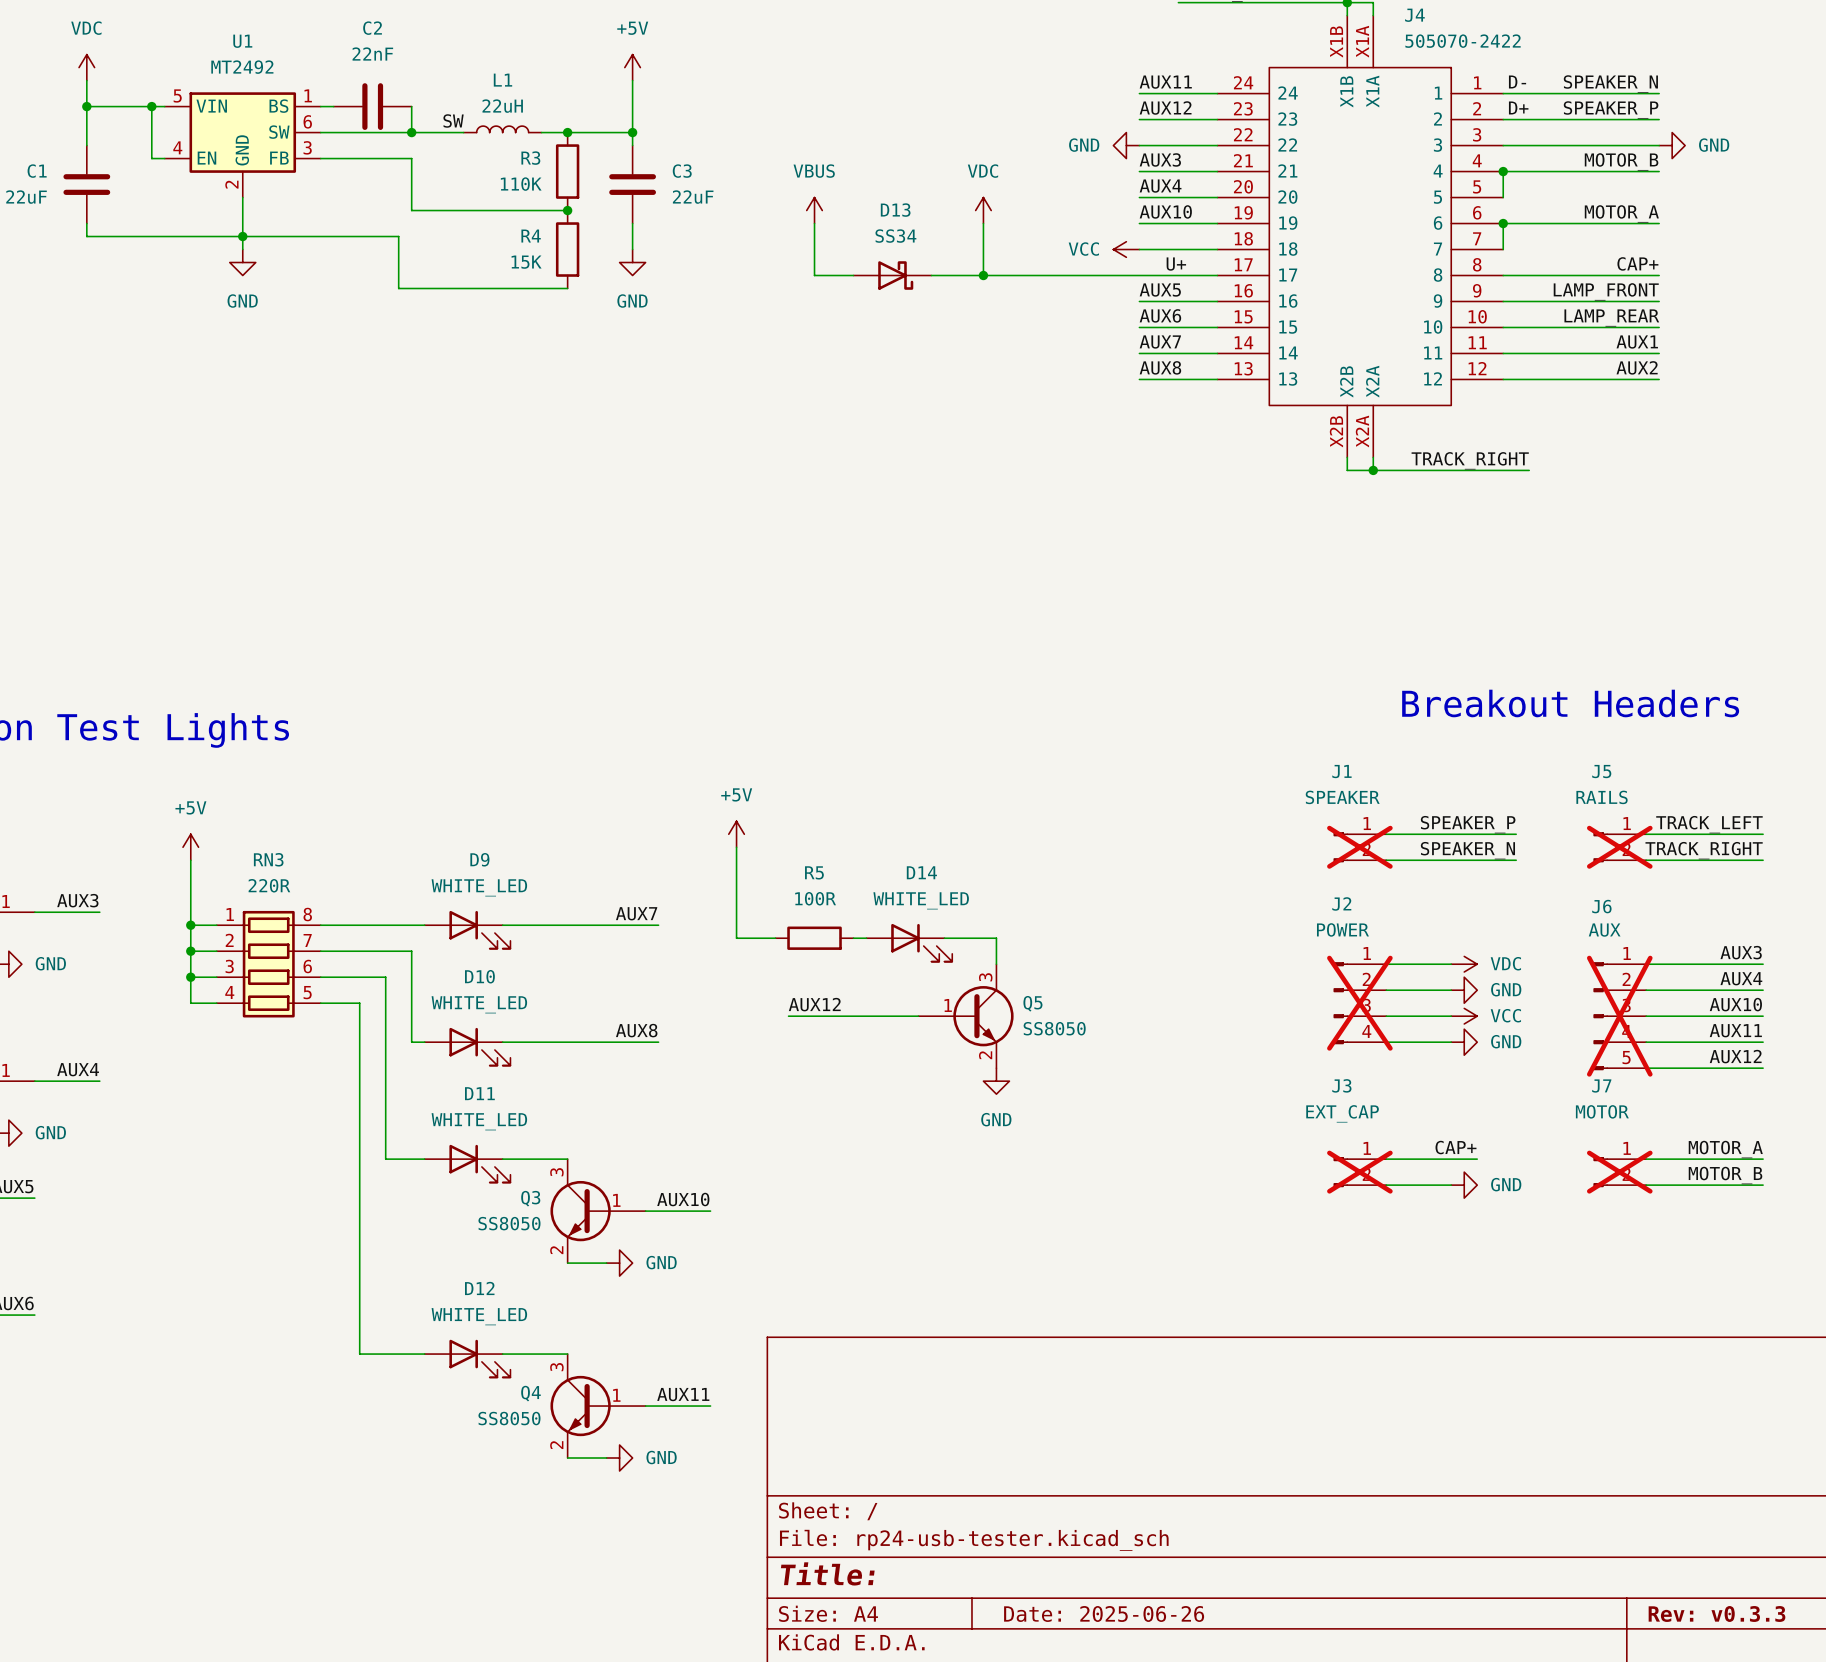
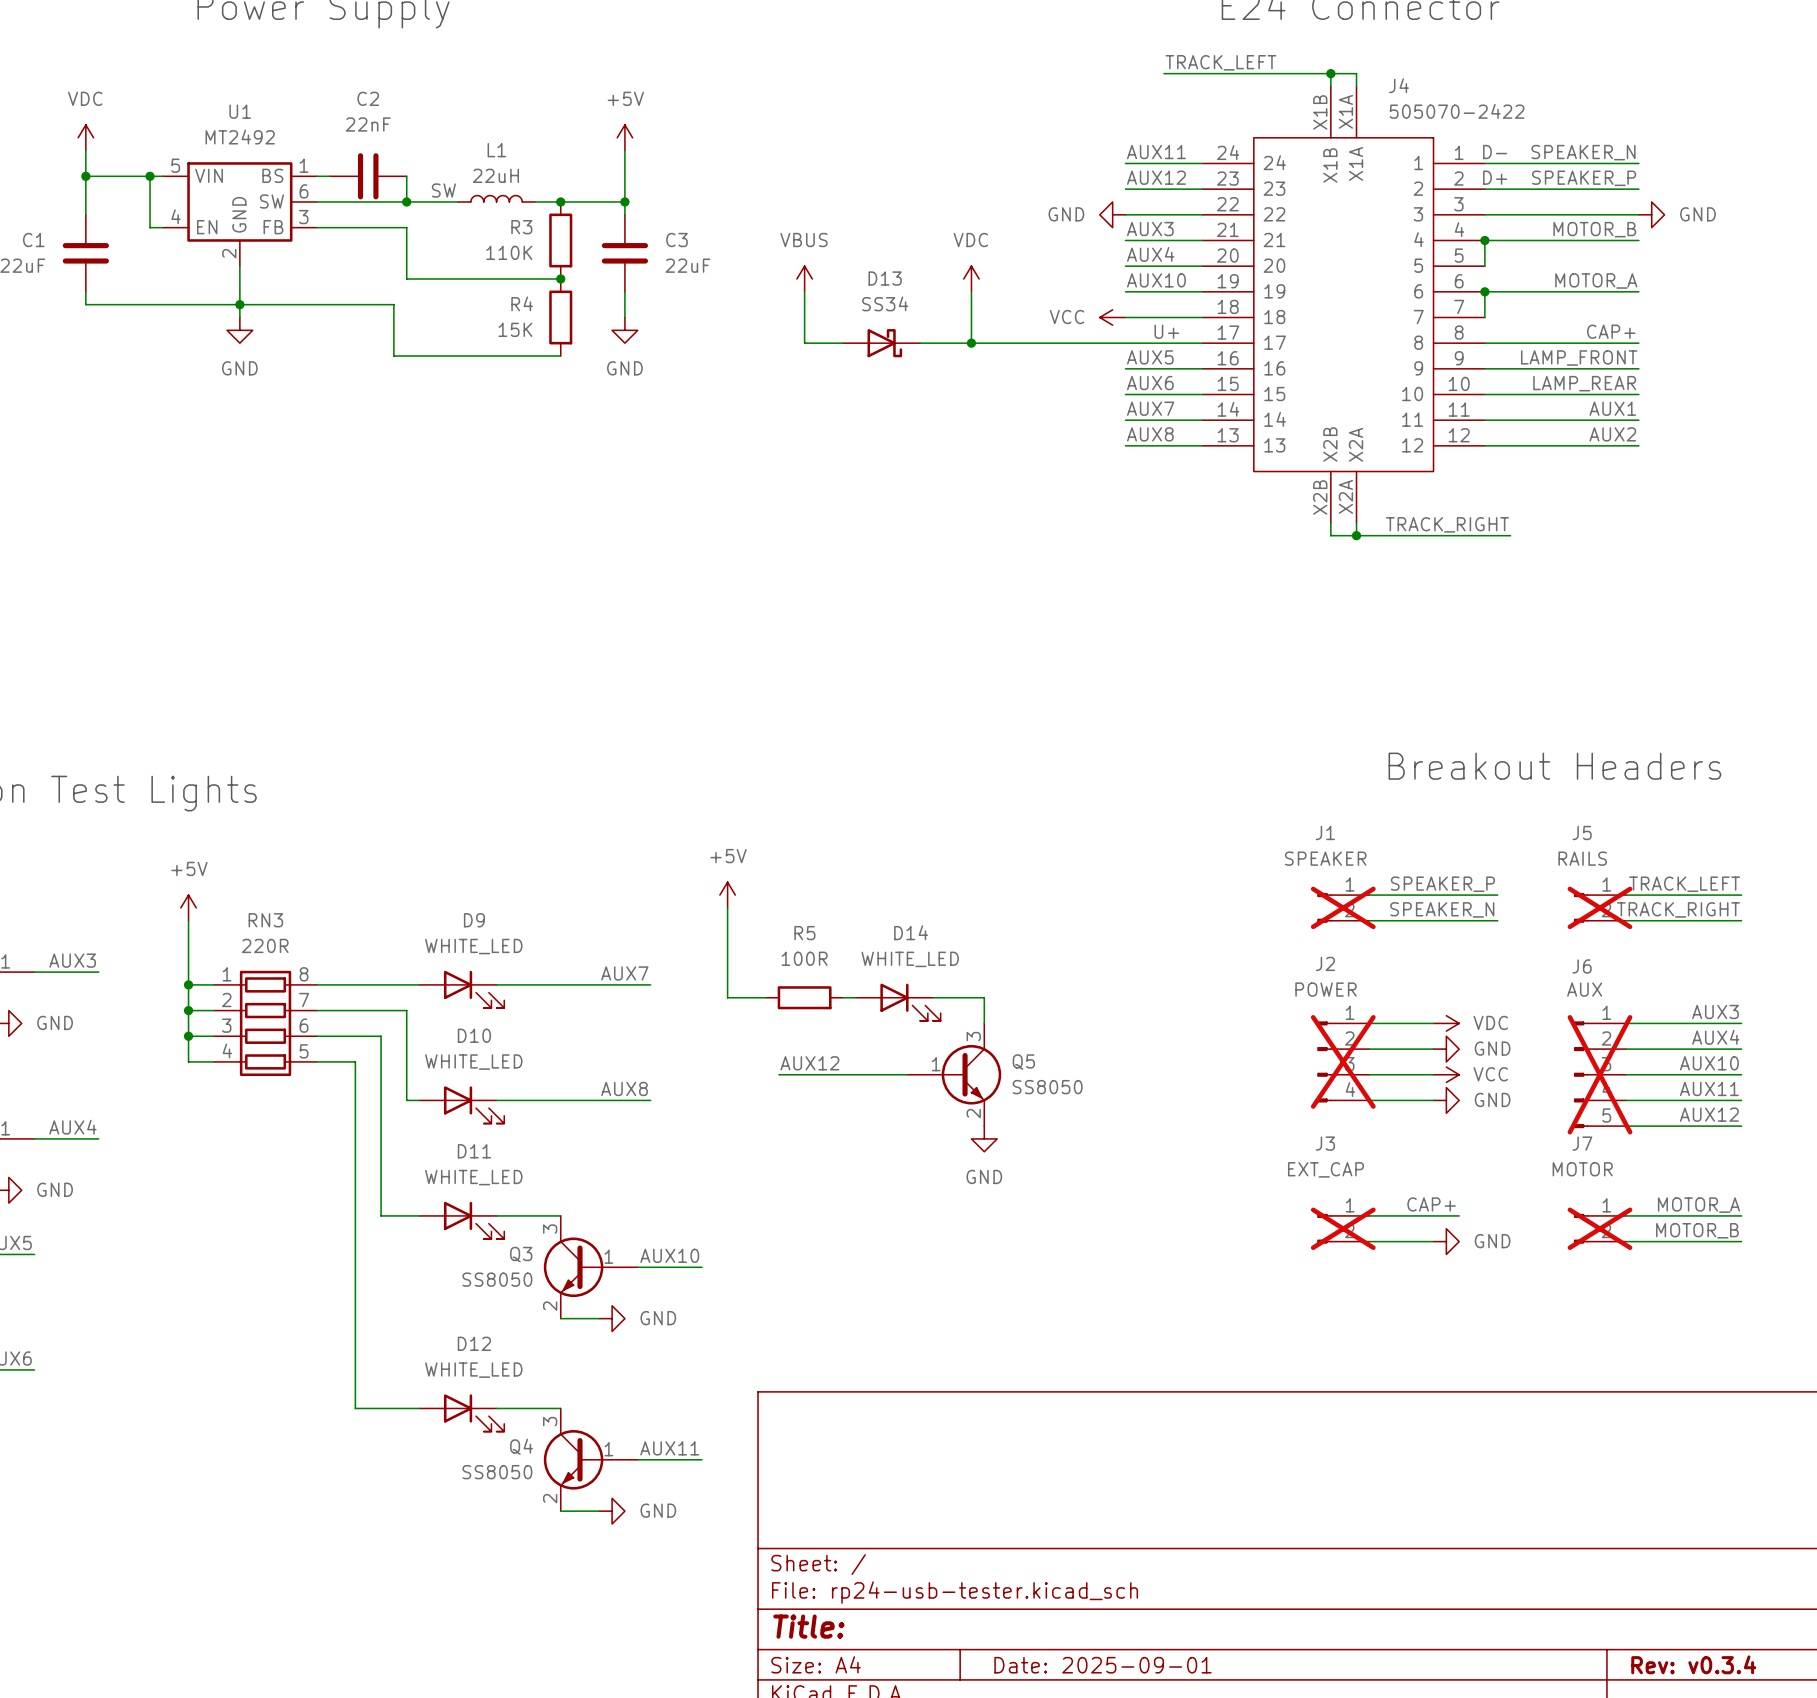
title block: Date: 2025-06-26 (1104, 1613) -> Date: 2025-09-01 (1103, 1665)
title block: Rev: v0.3.3 (1716, 1613) -> Rev: v0.3.4 (1693, 1664)

